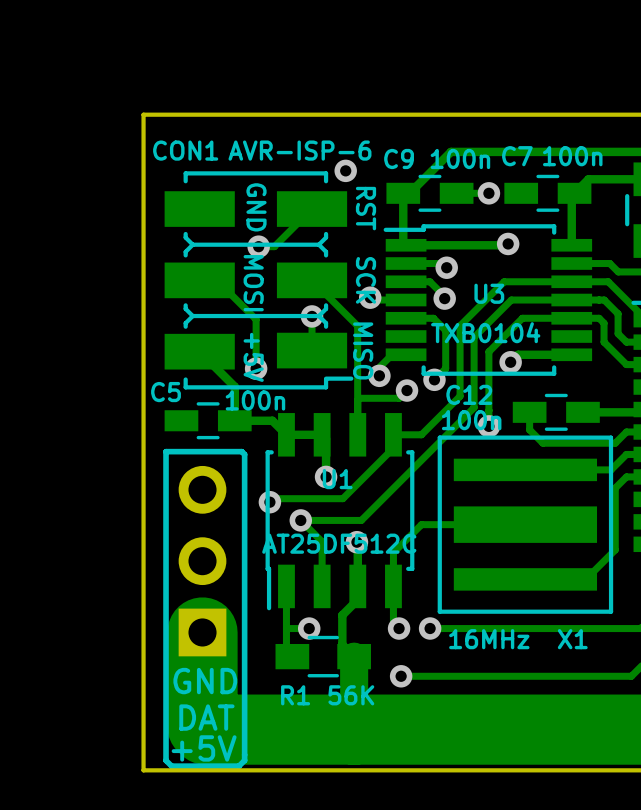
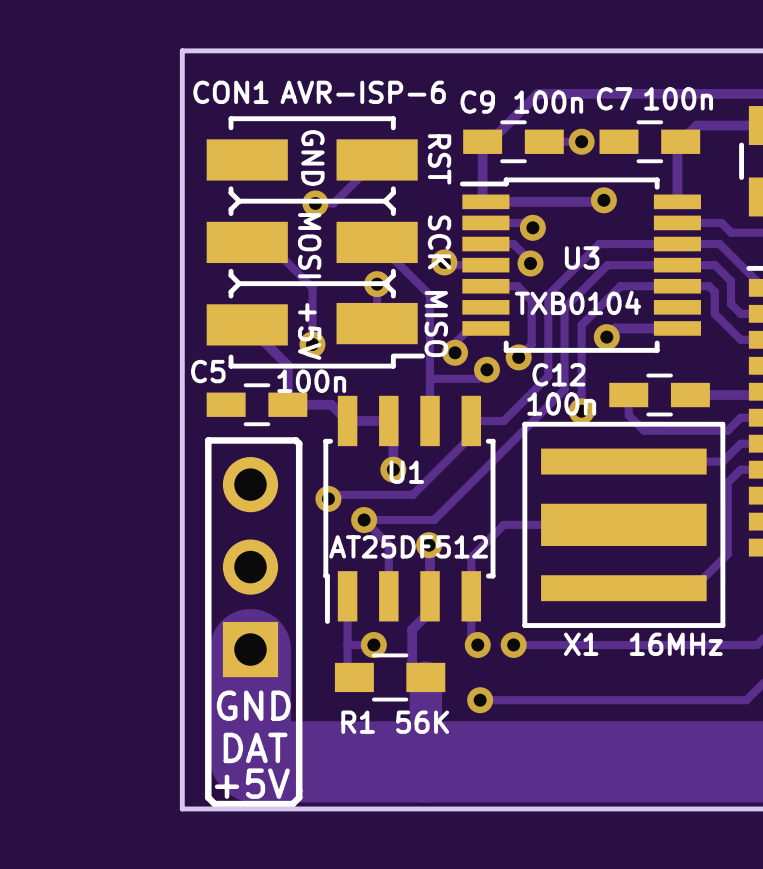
via: (345, 170) -> none
U1 value: AT25DF512C (339, 543) -> AT25DF512 (408, 546)
X1 value position: 16MHz (489, 639) -> 16MHz (676, 644)
X1 name position: X1 (572, 639) -> X1 (581, 644)

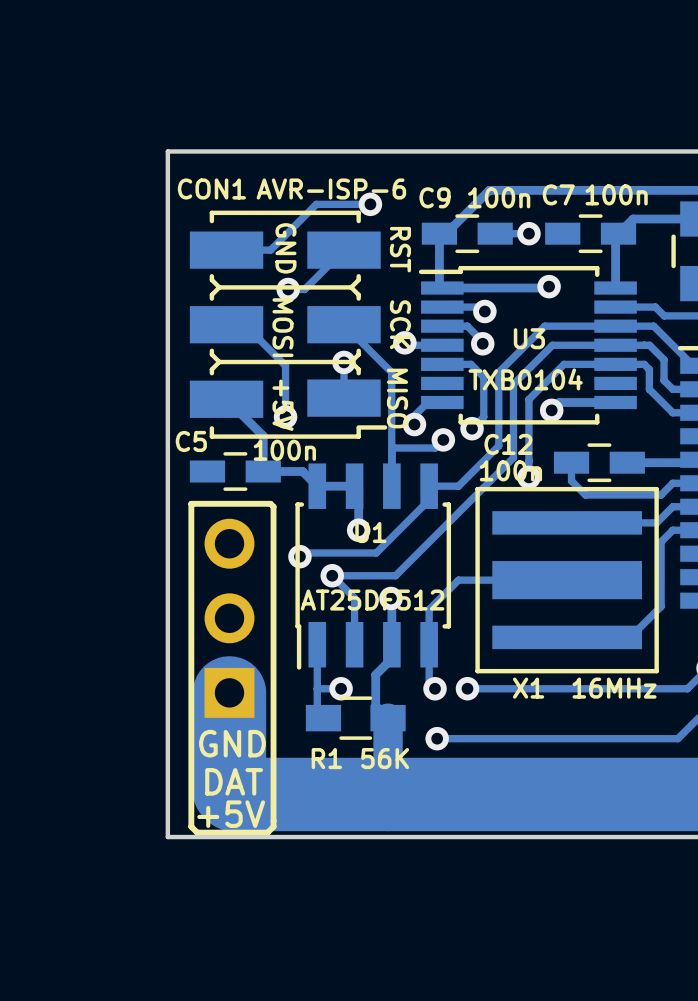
track: none -> (370, 204) (316, 204) (270, 250) (226, 250)
via: none -> (370, 204)

